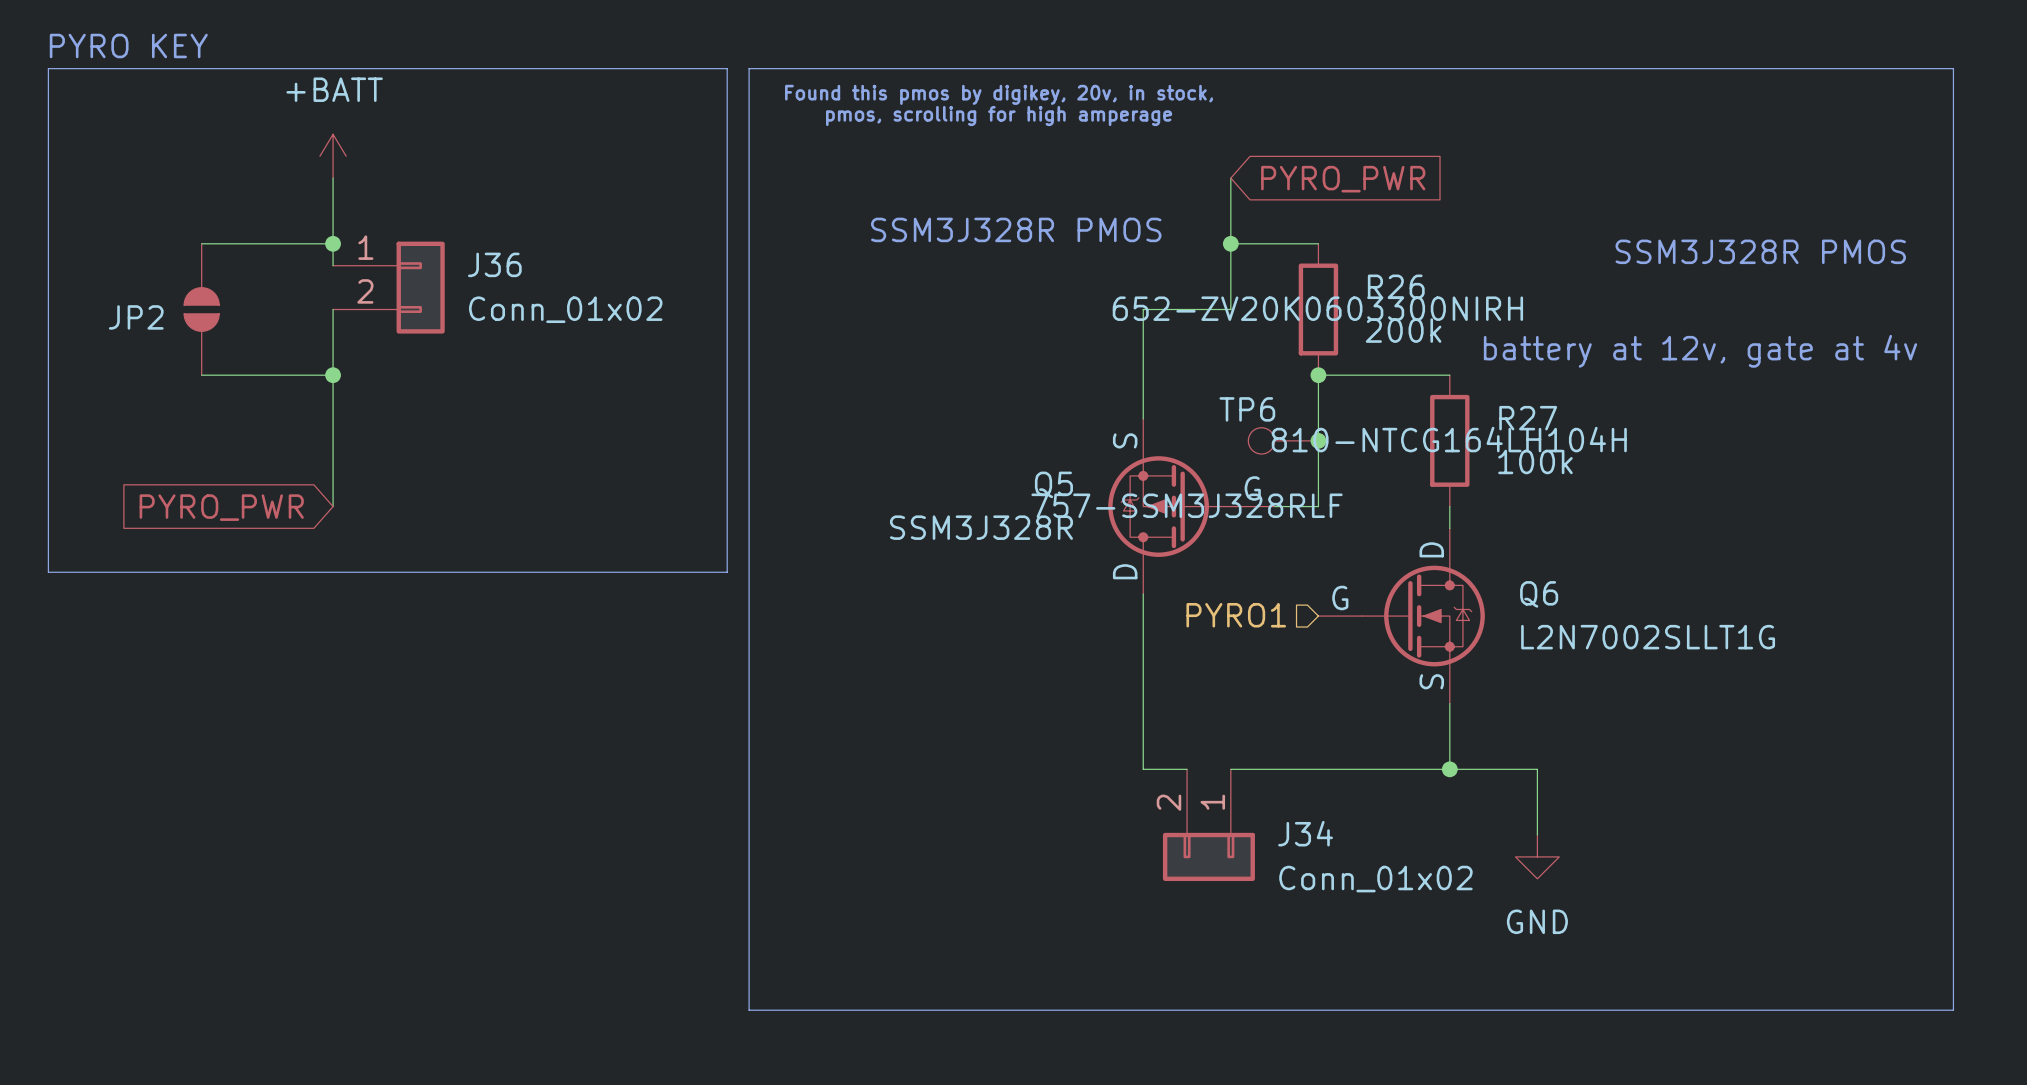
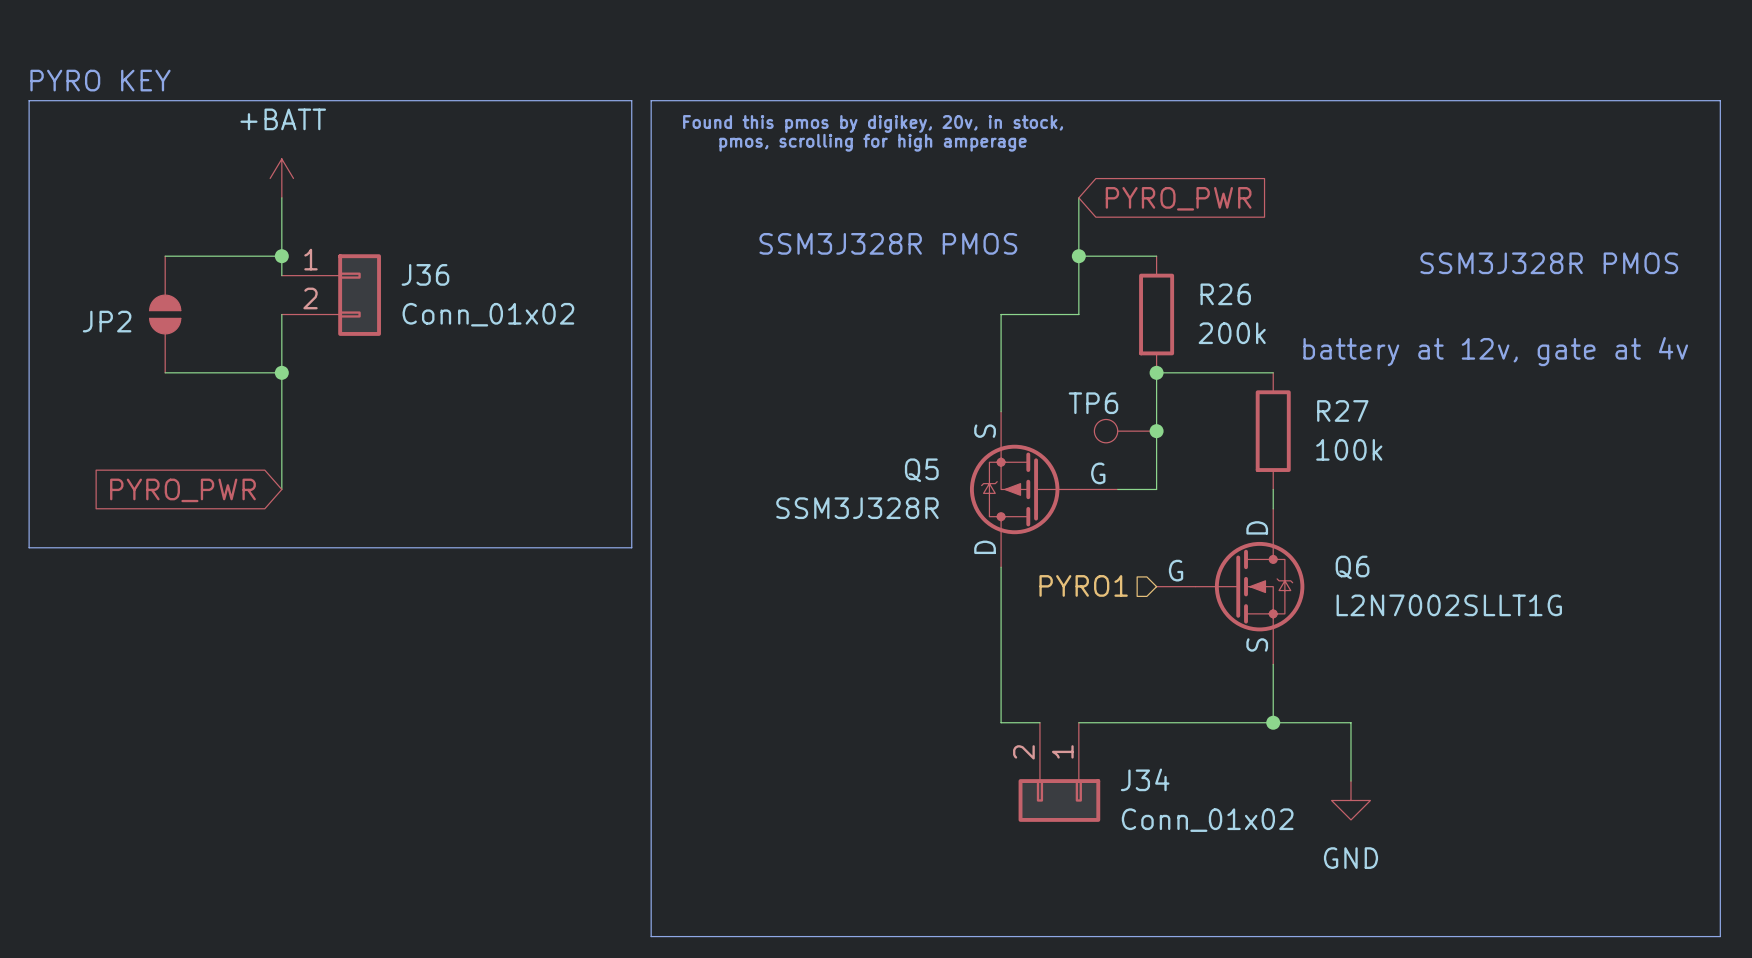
R26 text: 652-ZV20K0603300NIRH (1317, 308) -> none
R27 text: 810-NTCG164LH104H (1449, 439) -> none
Q5 text: 757-SSM3J328RLF (1187, 505) -> none

